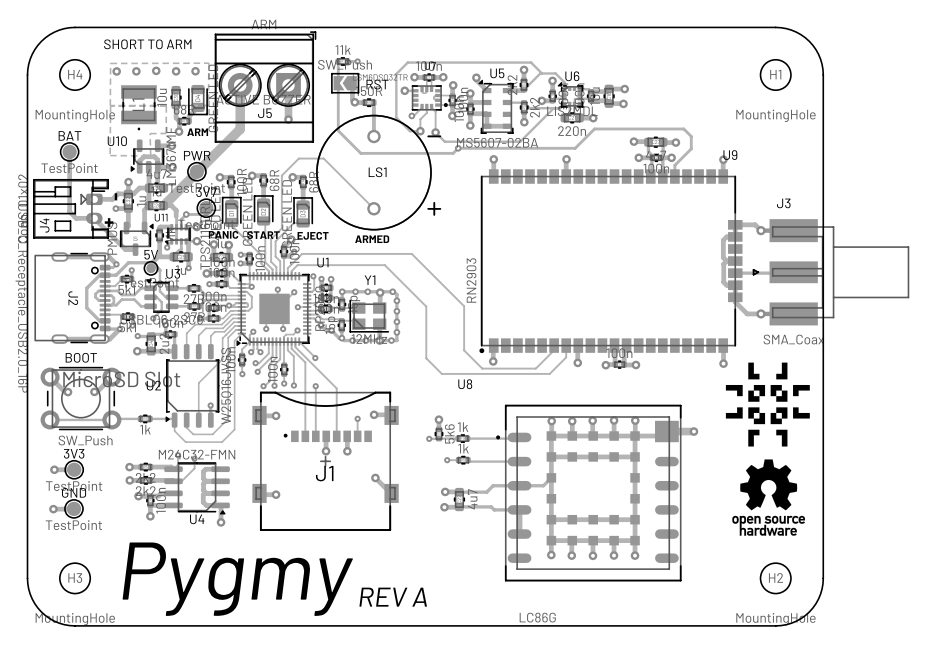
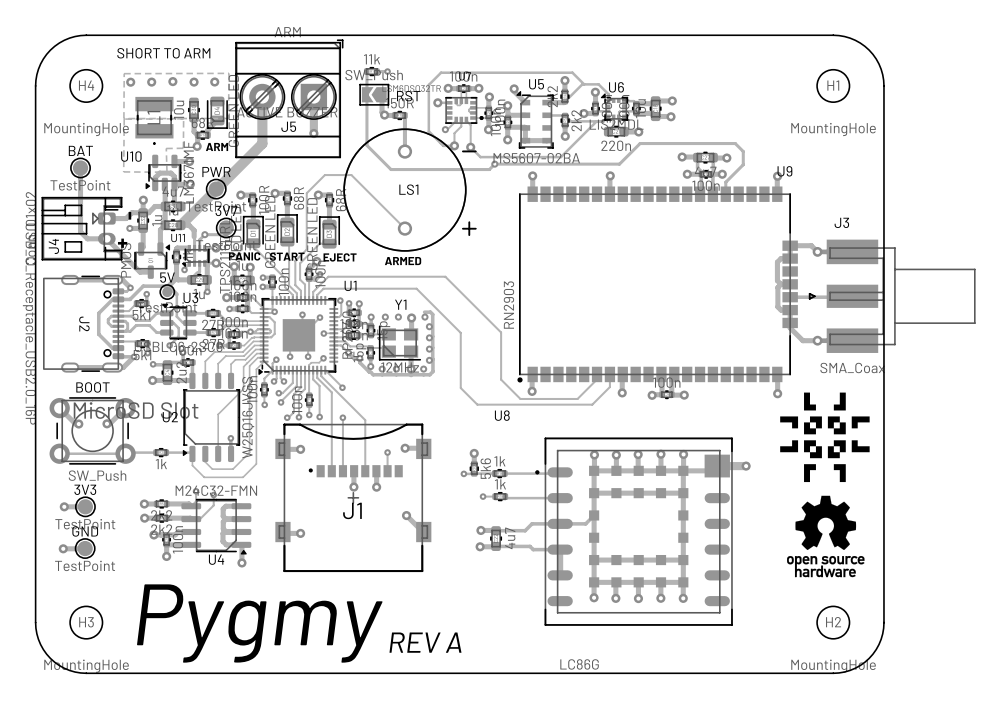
track: (342, 291) (394, 291) (396, 294) (396, 340) (344, 340) (331, 330) -> (424, 312) (430, 312) (432, 314) (432, 371) (429, 374) (373, 374) (359, 362) (359, 358)

